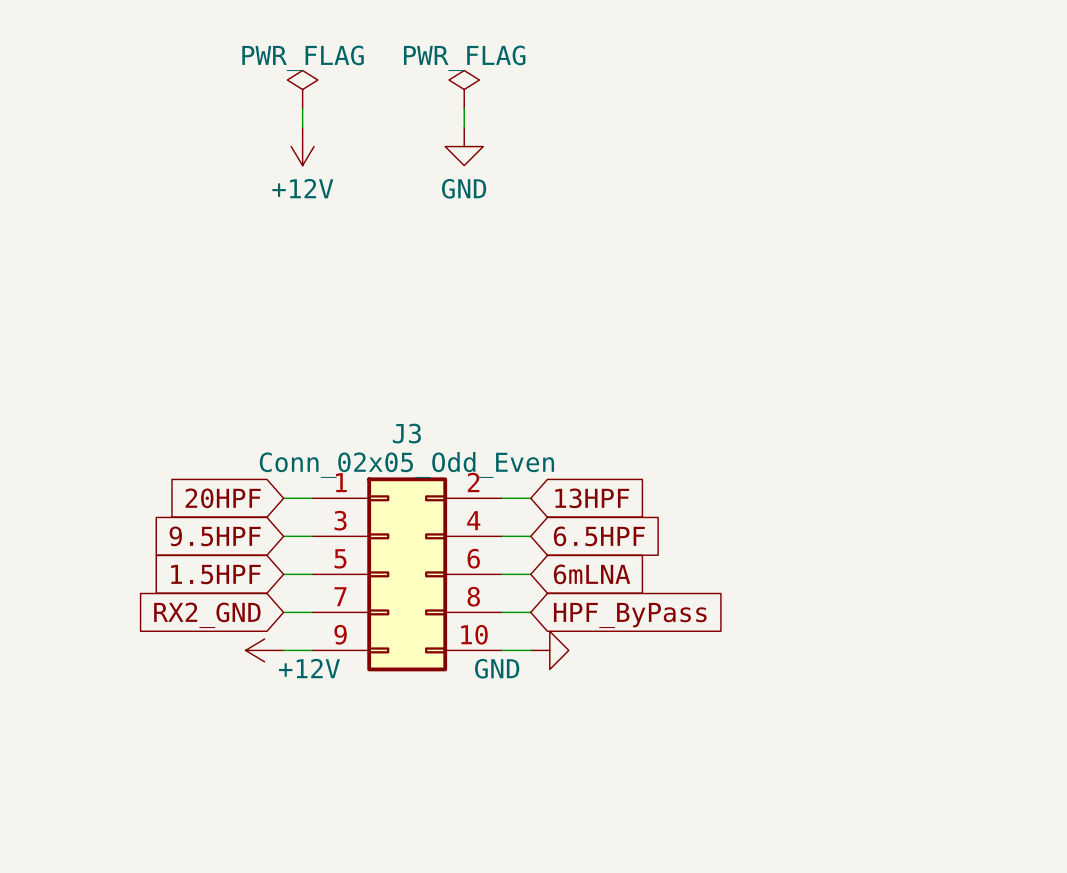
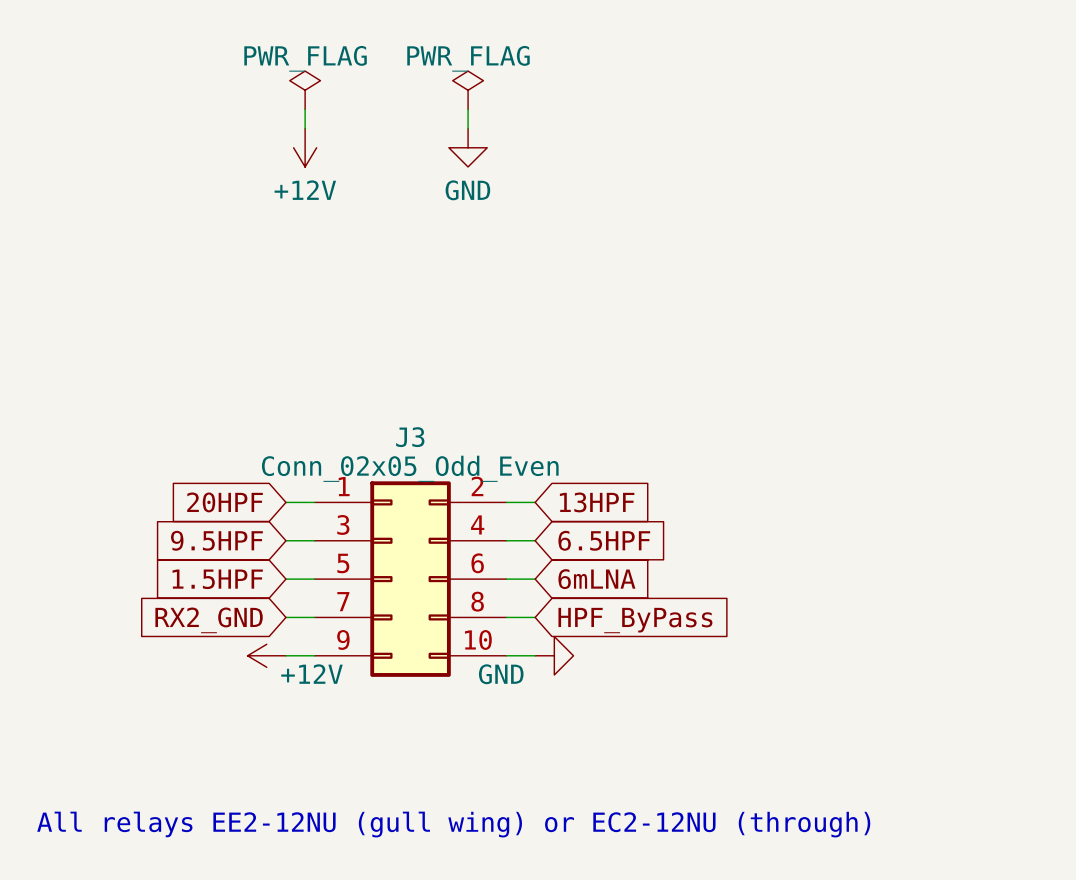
text: none -> All relays EE2-12NU (gull wing) or EC2-12NU (through) (453, 824)

